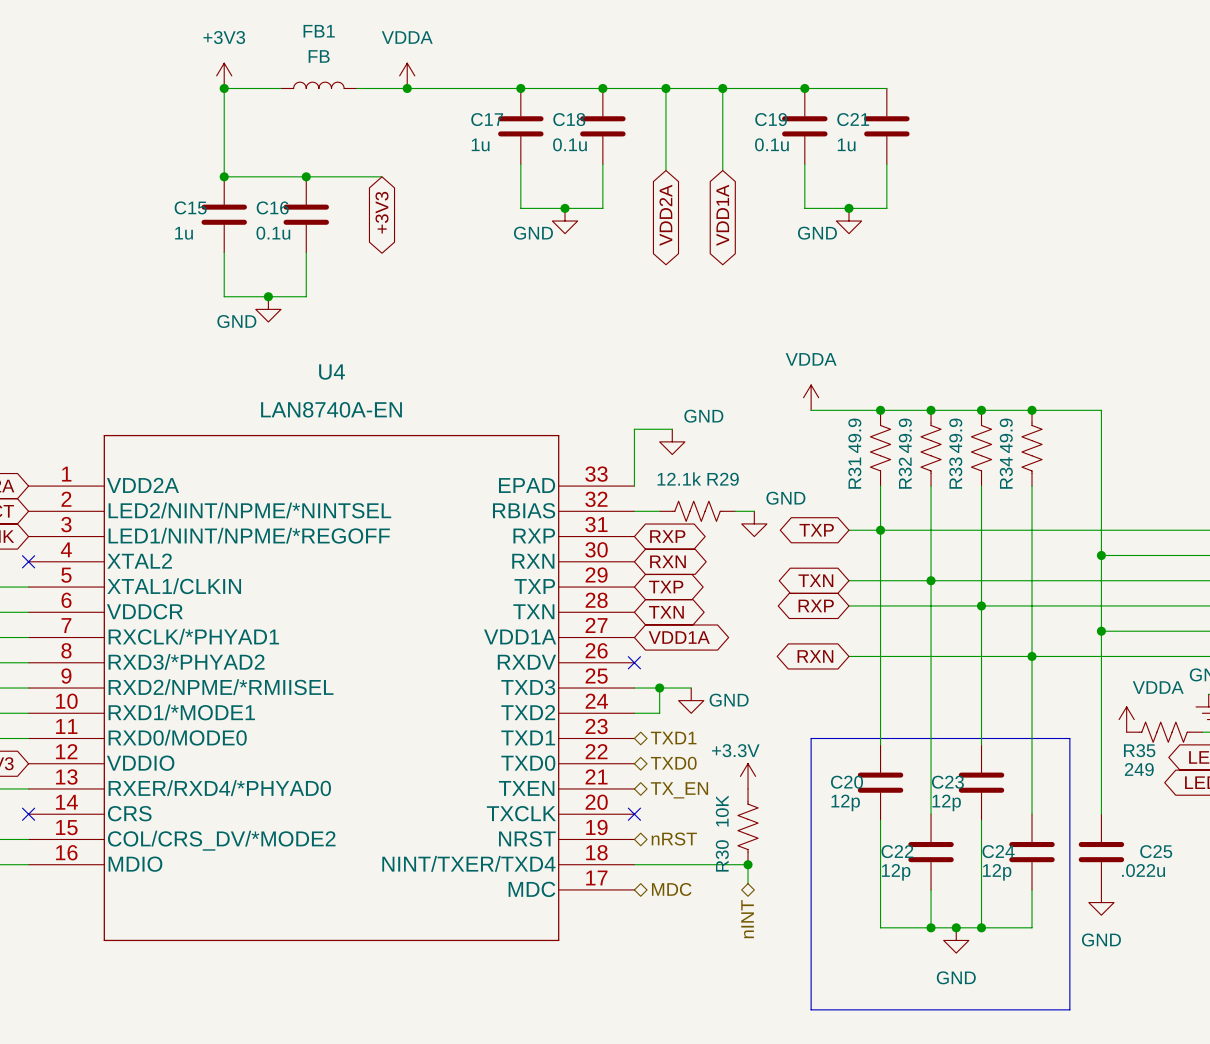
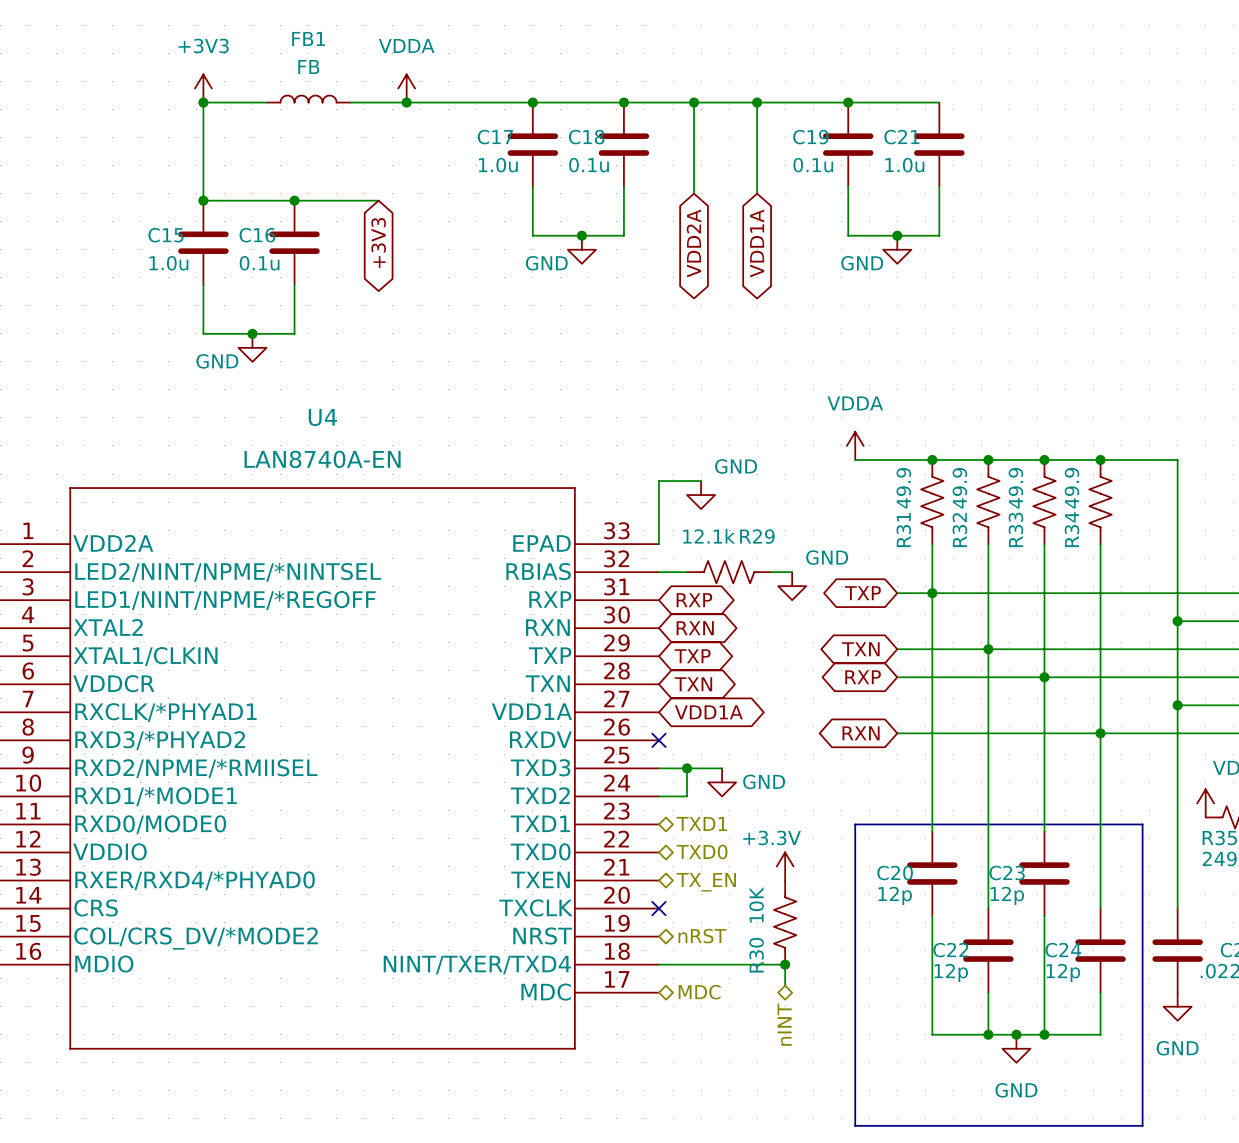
C17 value: 1u (480, 144) -> 1.0u (498, 165)
C21 value: 1u (846, 144) -> 1.0u (904, 165)
C15 value: 1u (184, 233) -> 1.0u (168, 263)

